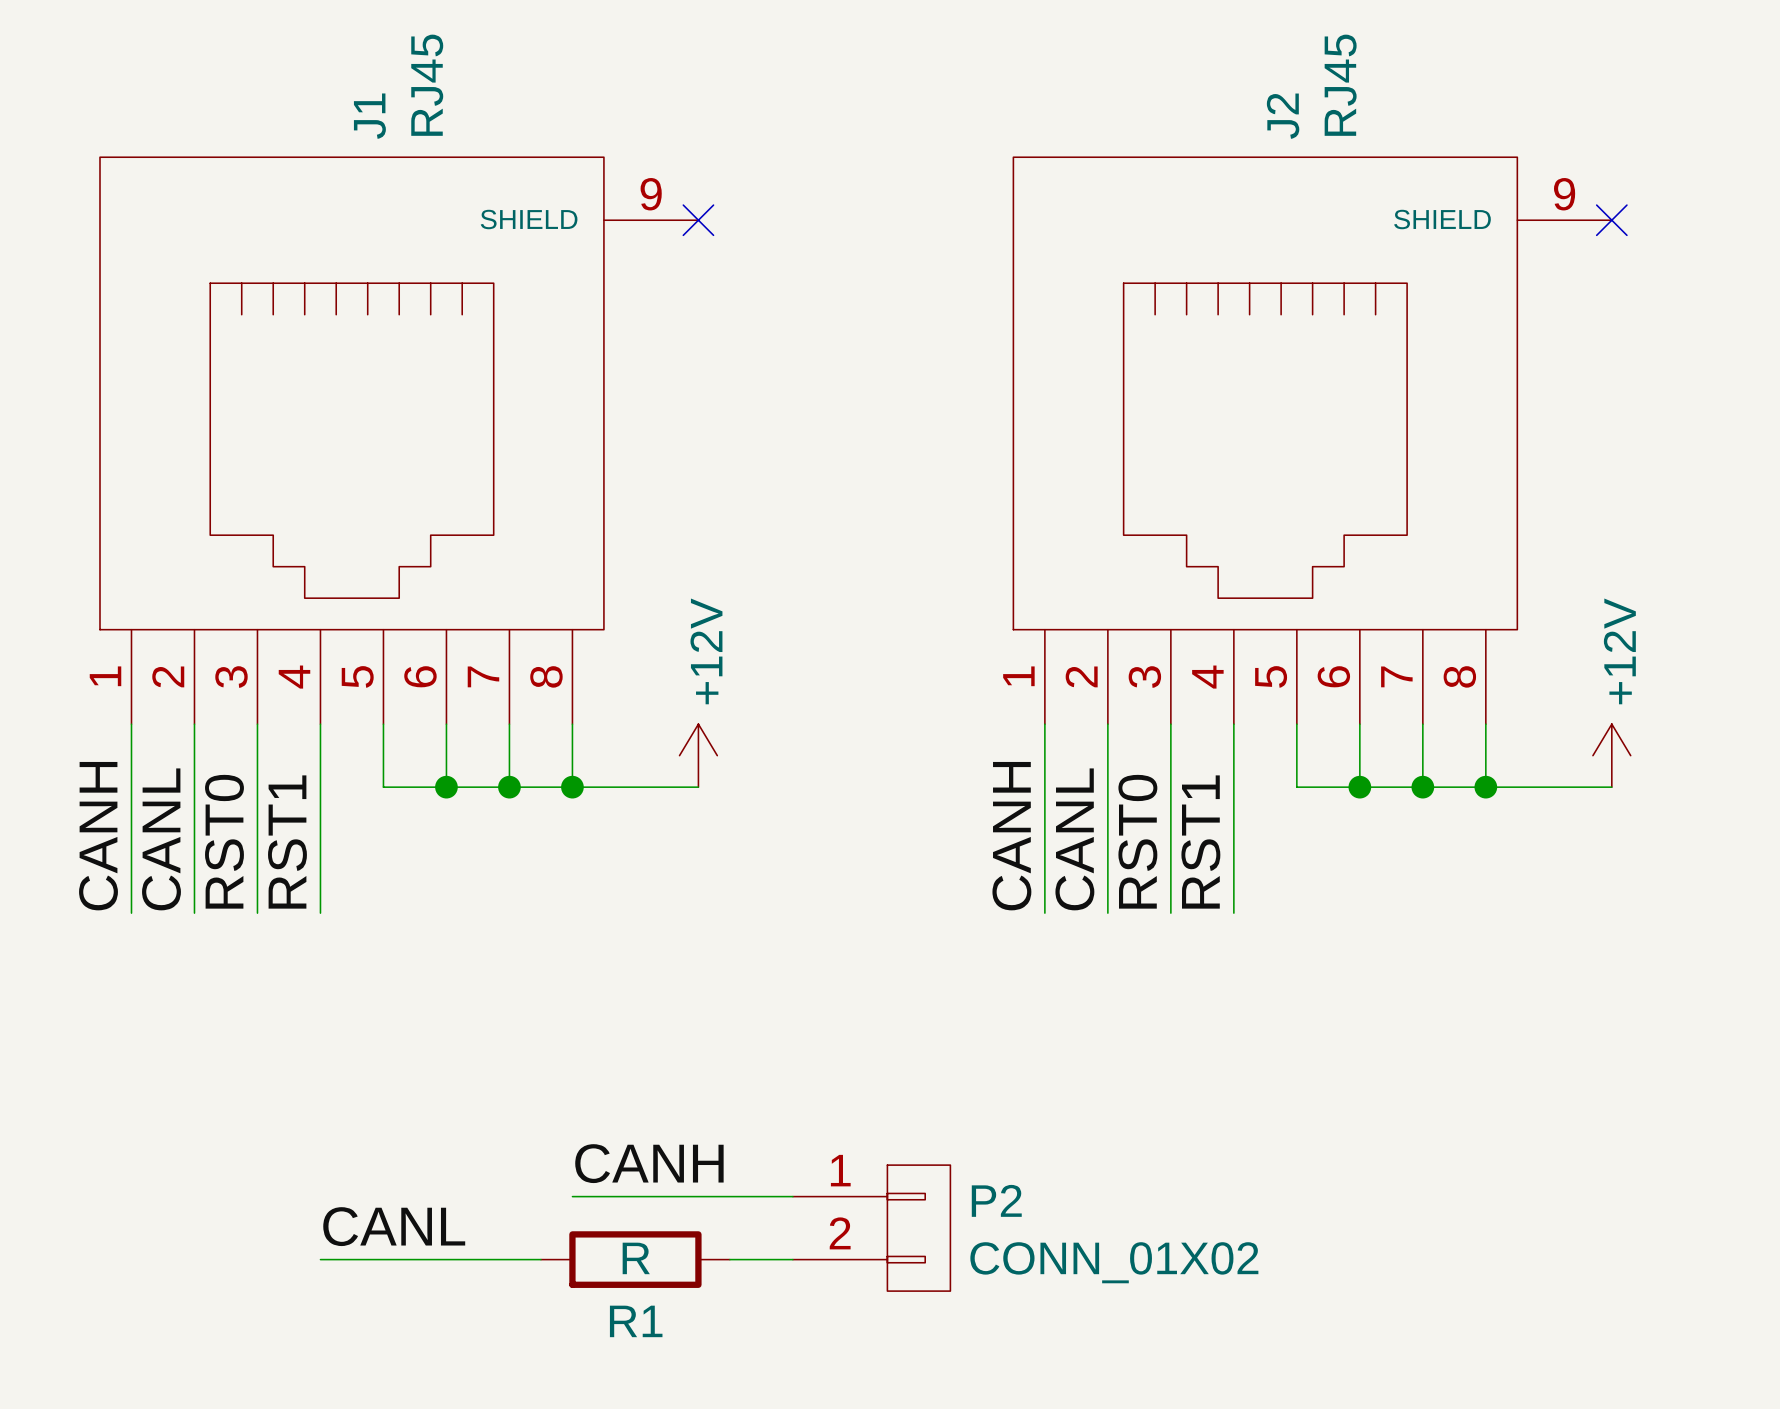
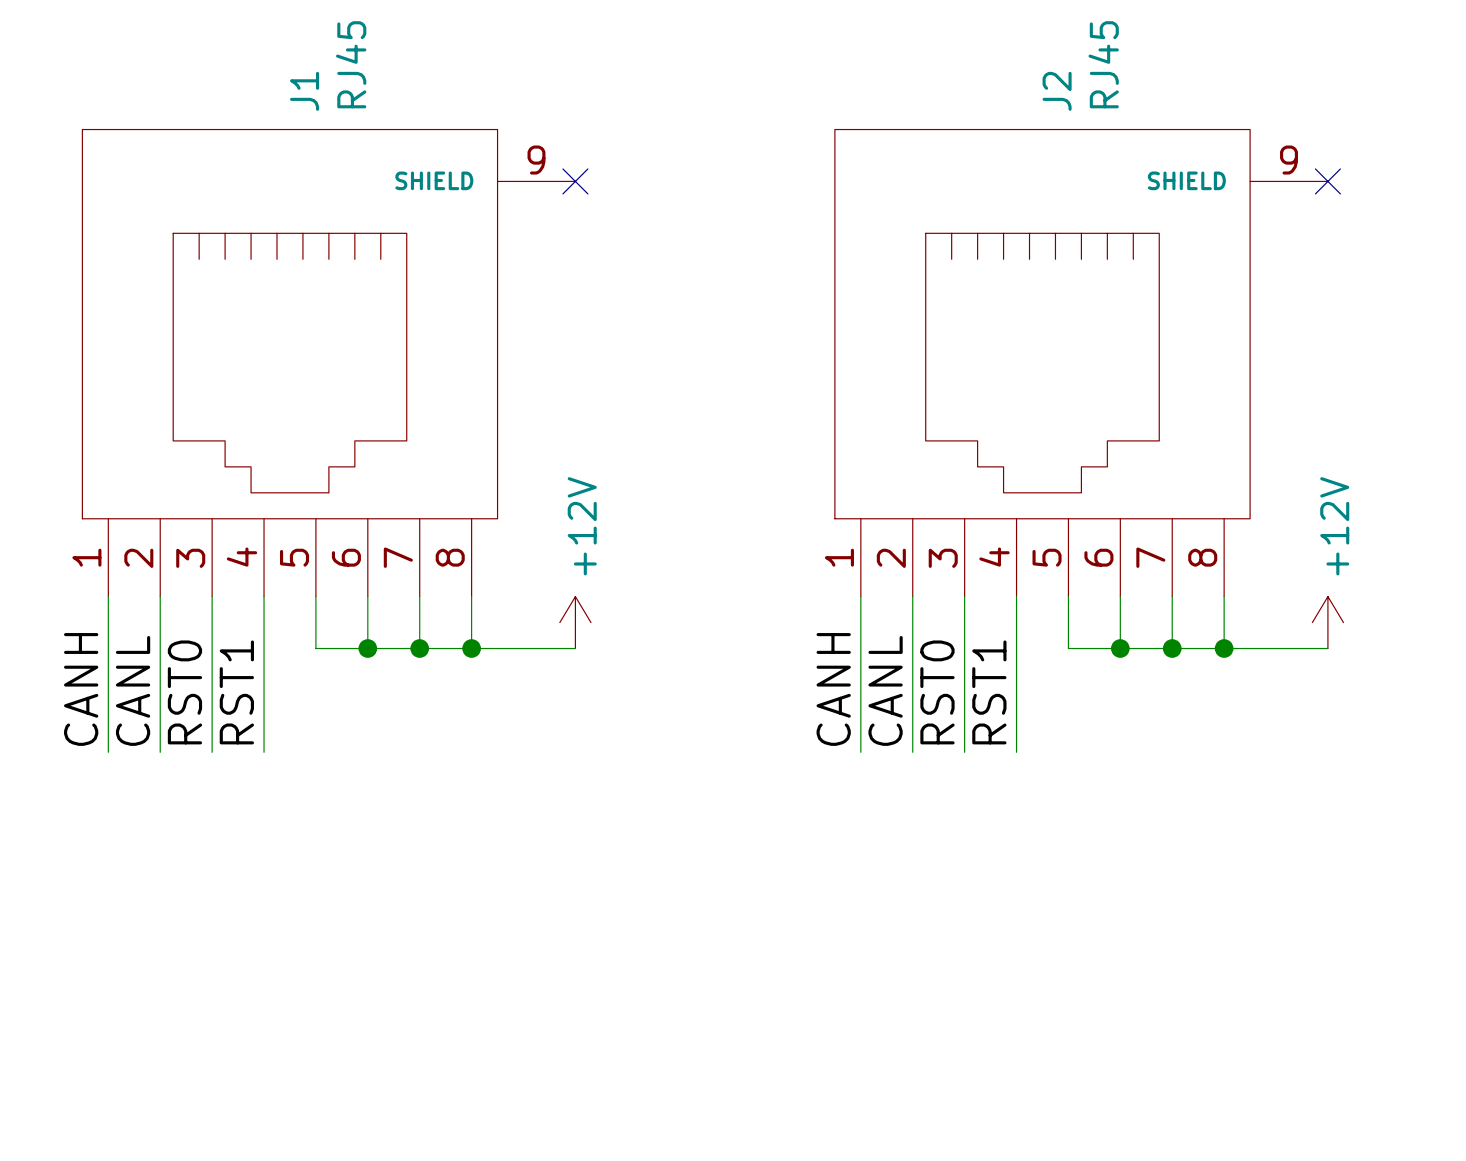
label: CANH (649, 1163) -> none
wire: (572, 1196) (792, 1196) -> none
label: CANL (394, 1226) -> none
P2: CONN_01X02 (871, 1228) -> none
wire: (320, 1259) (540, 1259) -> none
R1: R (635, 1259) -> none
wire: (729, 1259) (792, 1259) -> none

